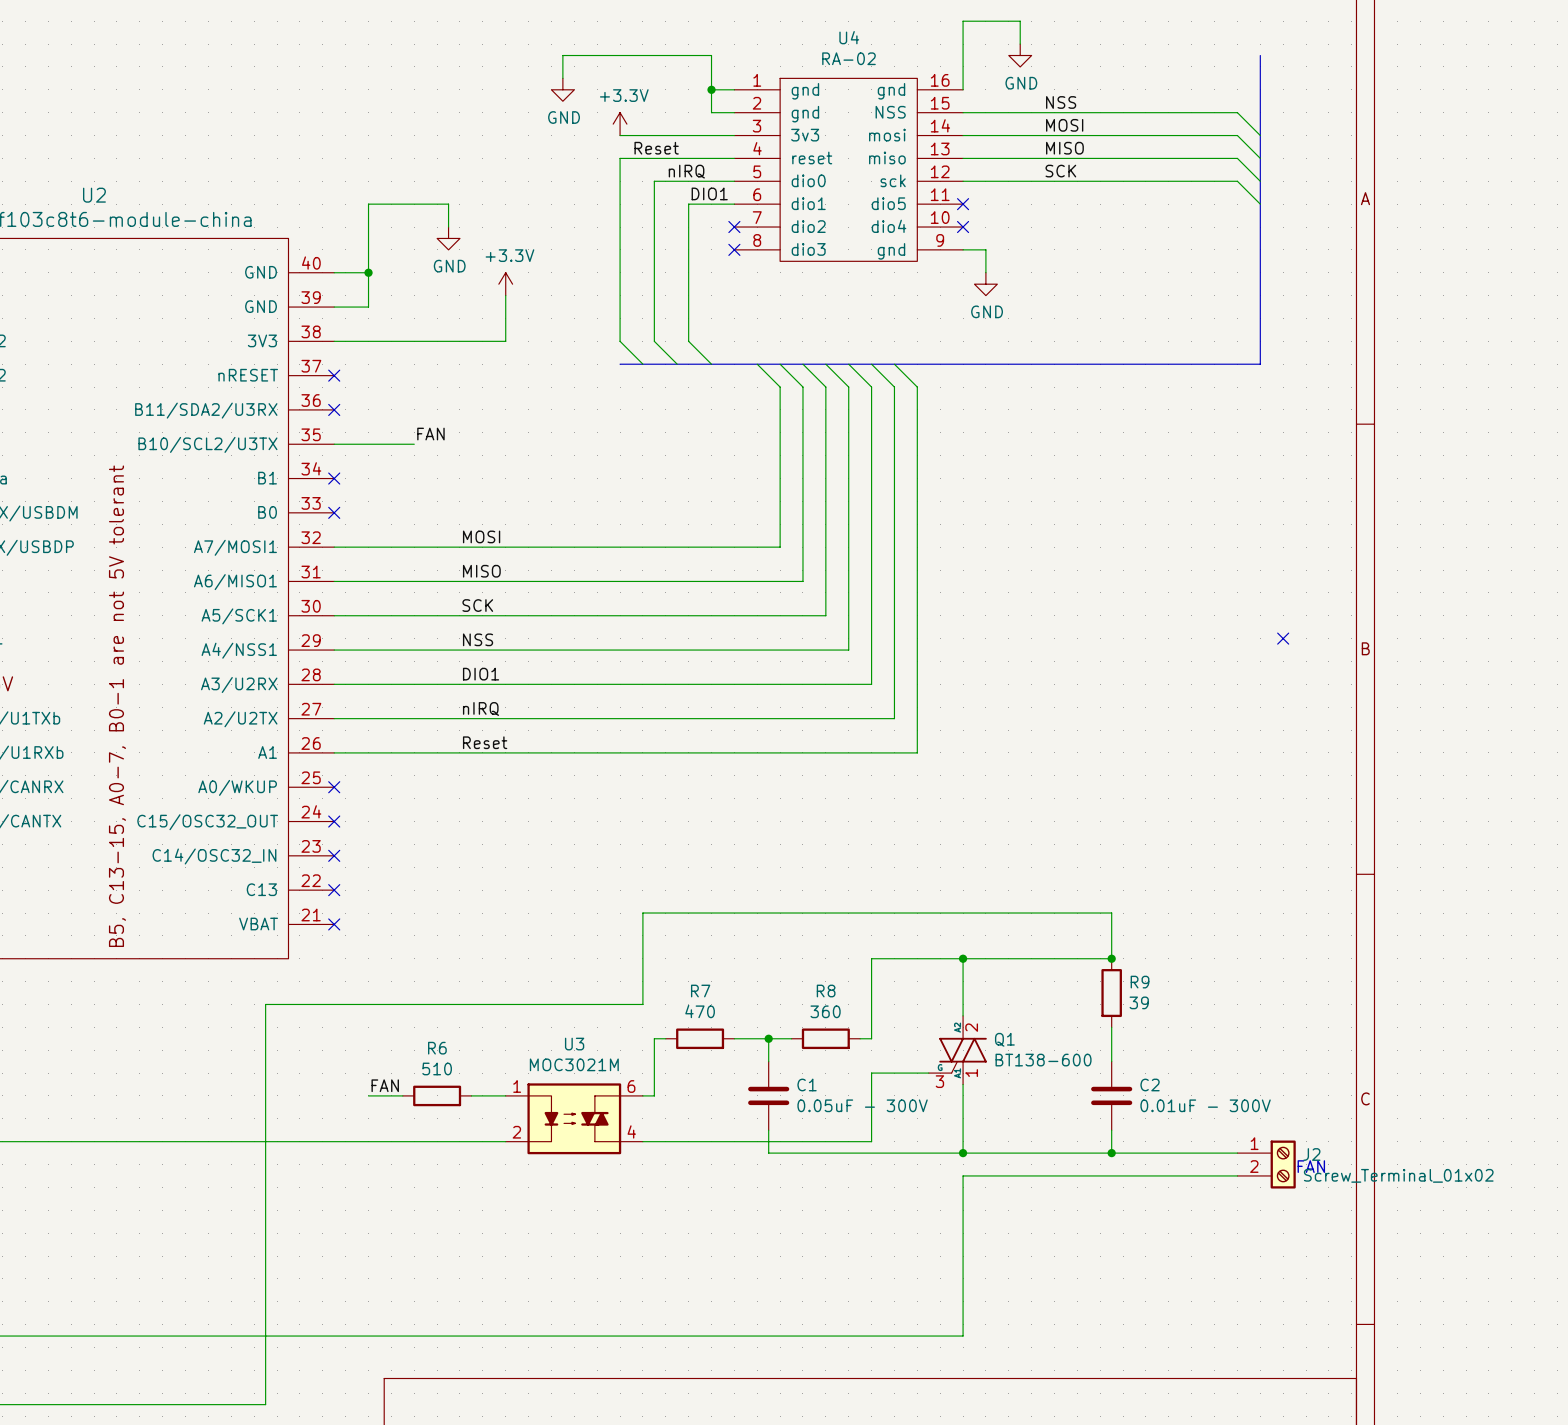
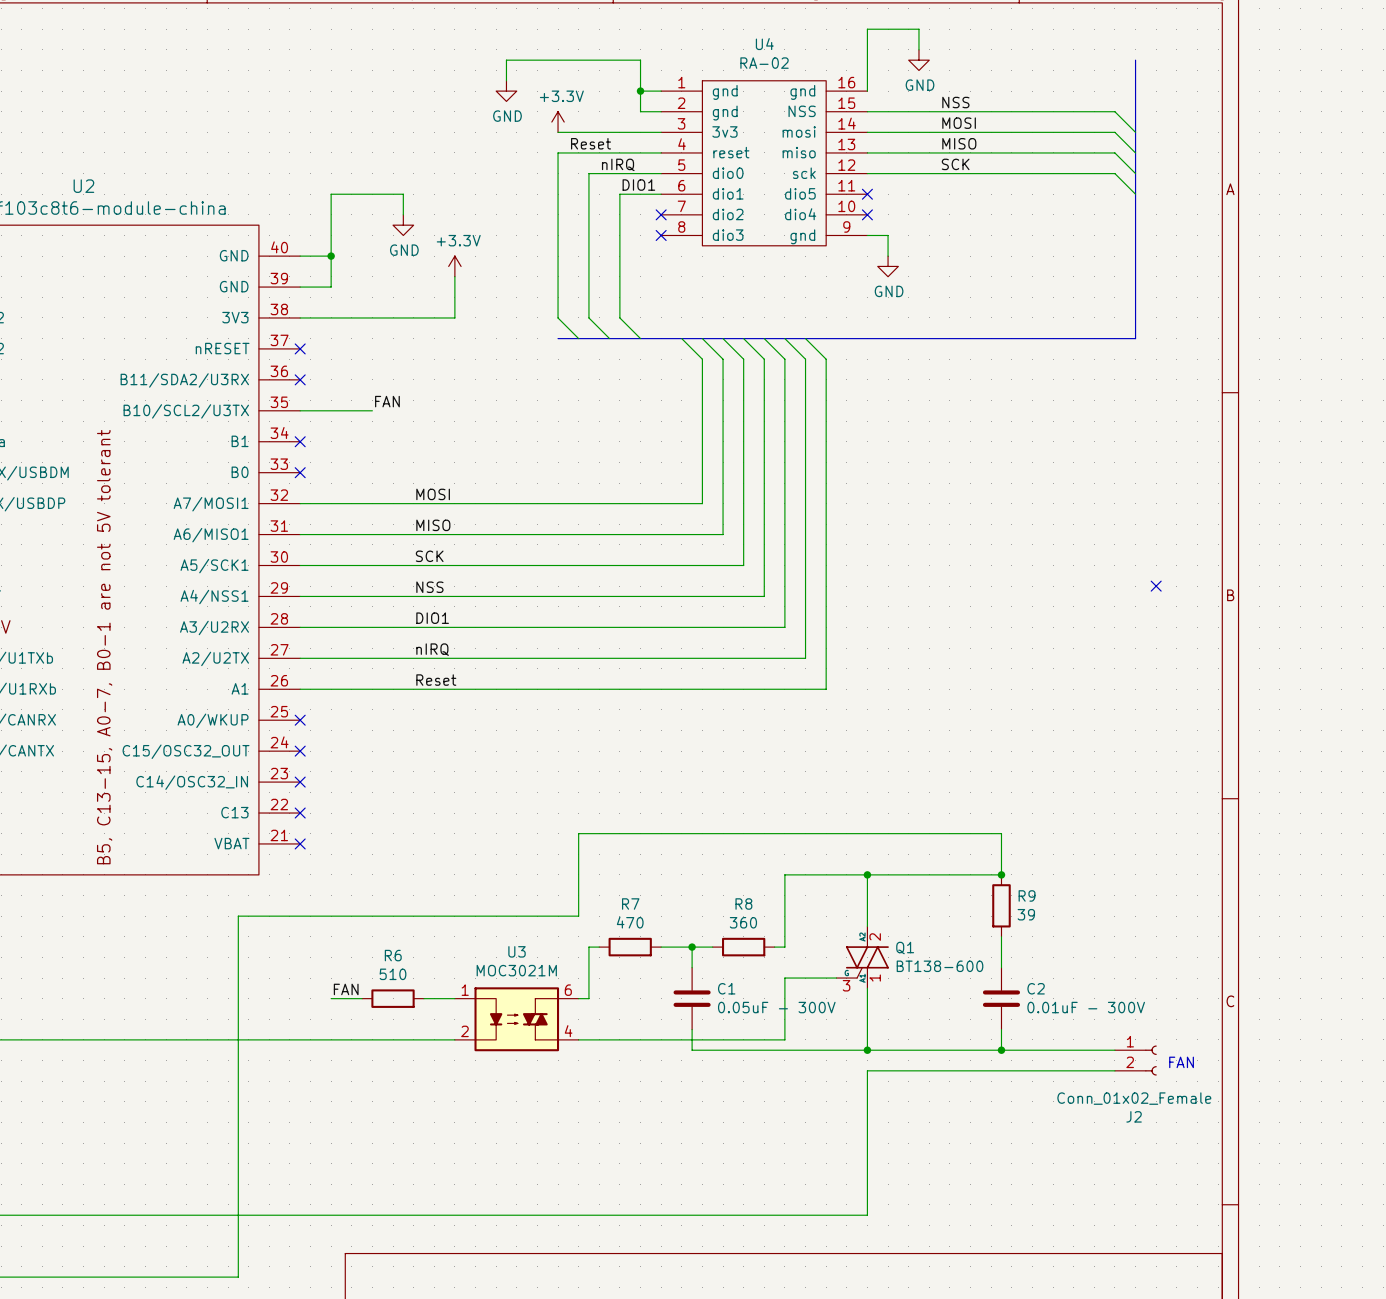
J2 symbol: [1237, 1140, 1296, 1189] -> [1114, 1045, 1157, 1076]
J2 name position: J2 (1311, 1154) -> J2 (1134, 1116)
J2 value: Screw_Terminal_01x02 (1398, 1175) -> Conn_01x02_Female (1134, 1098)

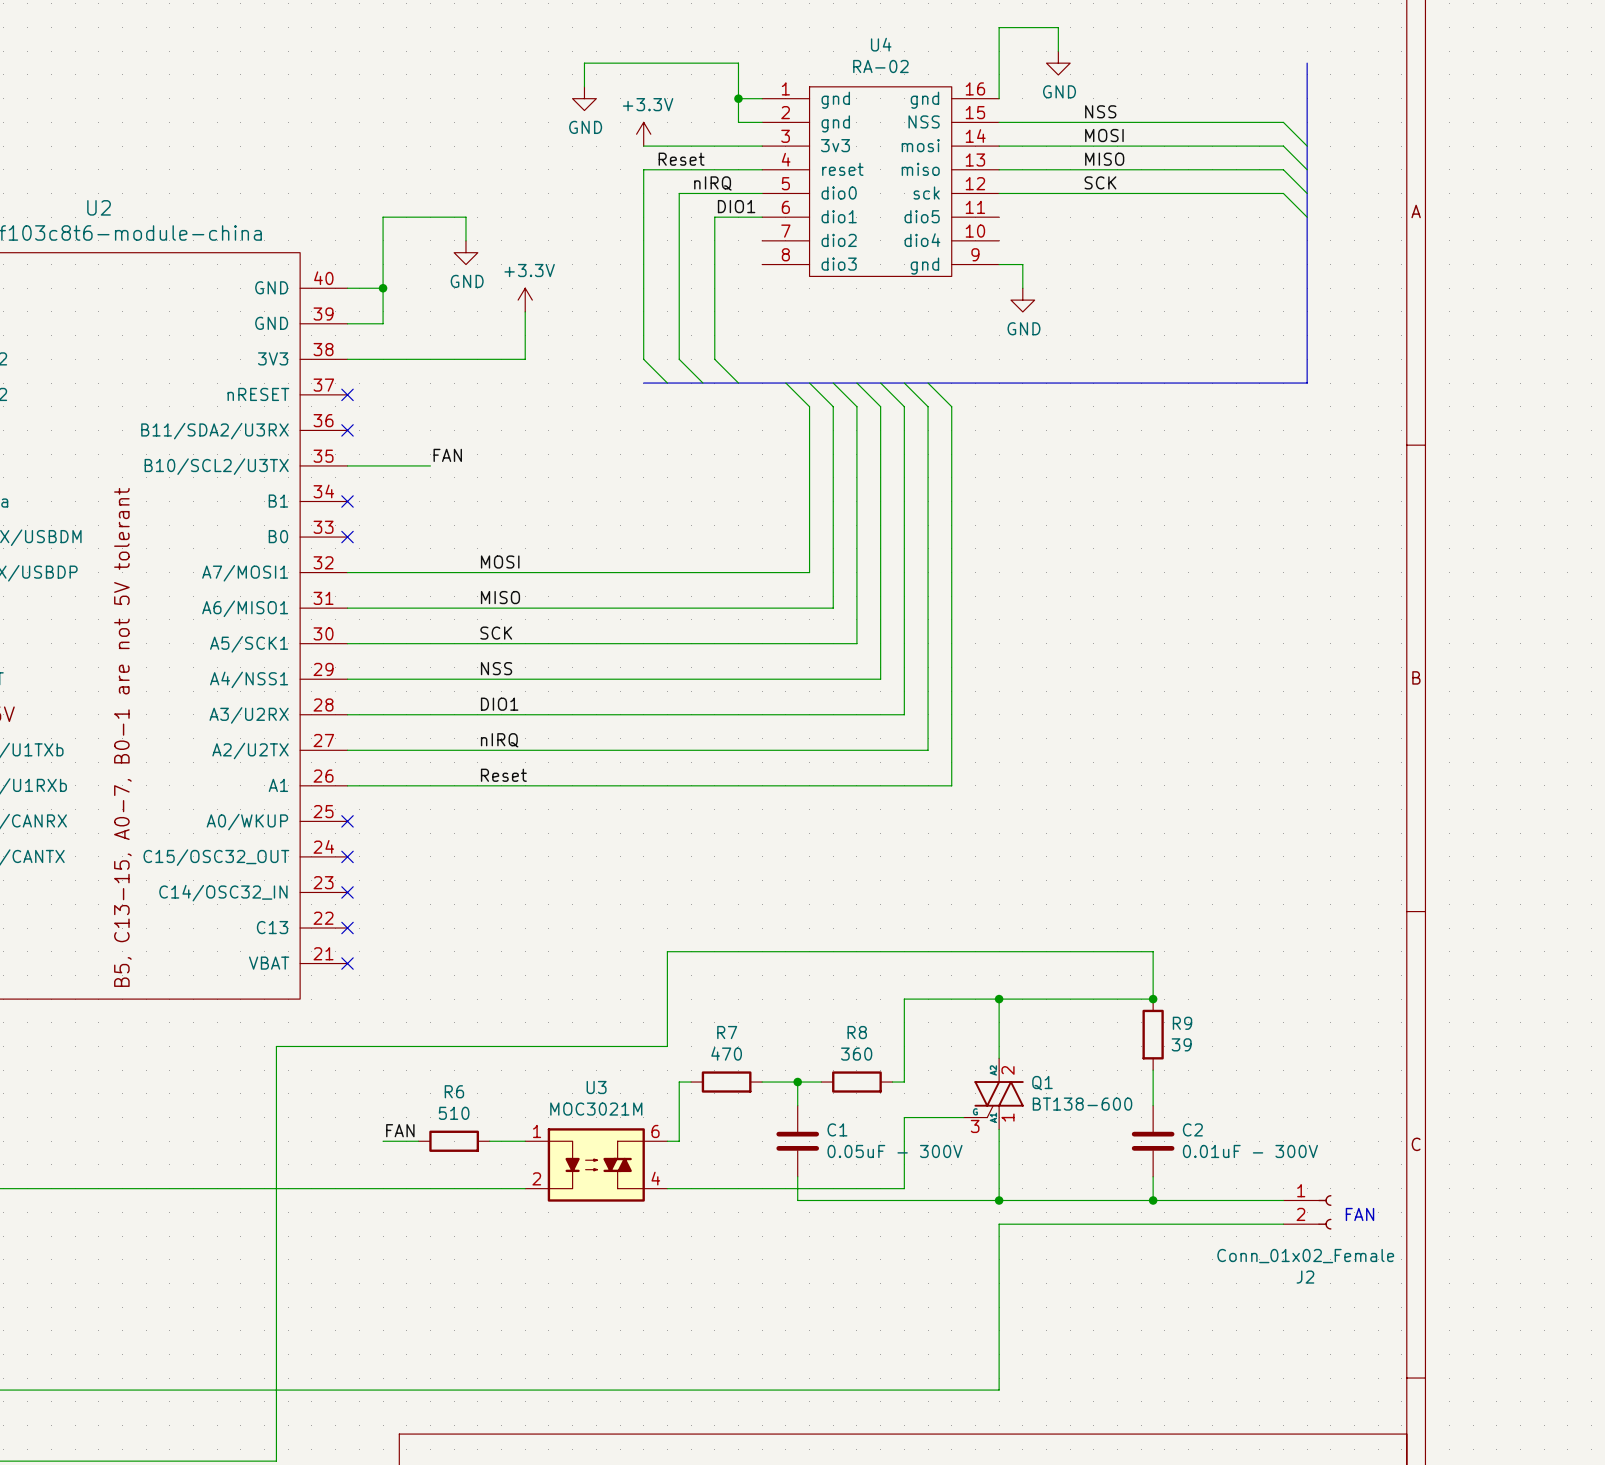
no-connect mark: (867, 194) -> none
no-connect mark: (661, 214) -> none
no-connect mark: (867, 214) -> none
no-connect mark: (661, 235) -> none
no-connect mark: (1156, 586) -> none

